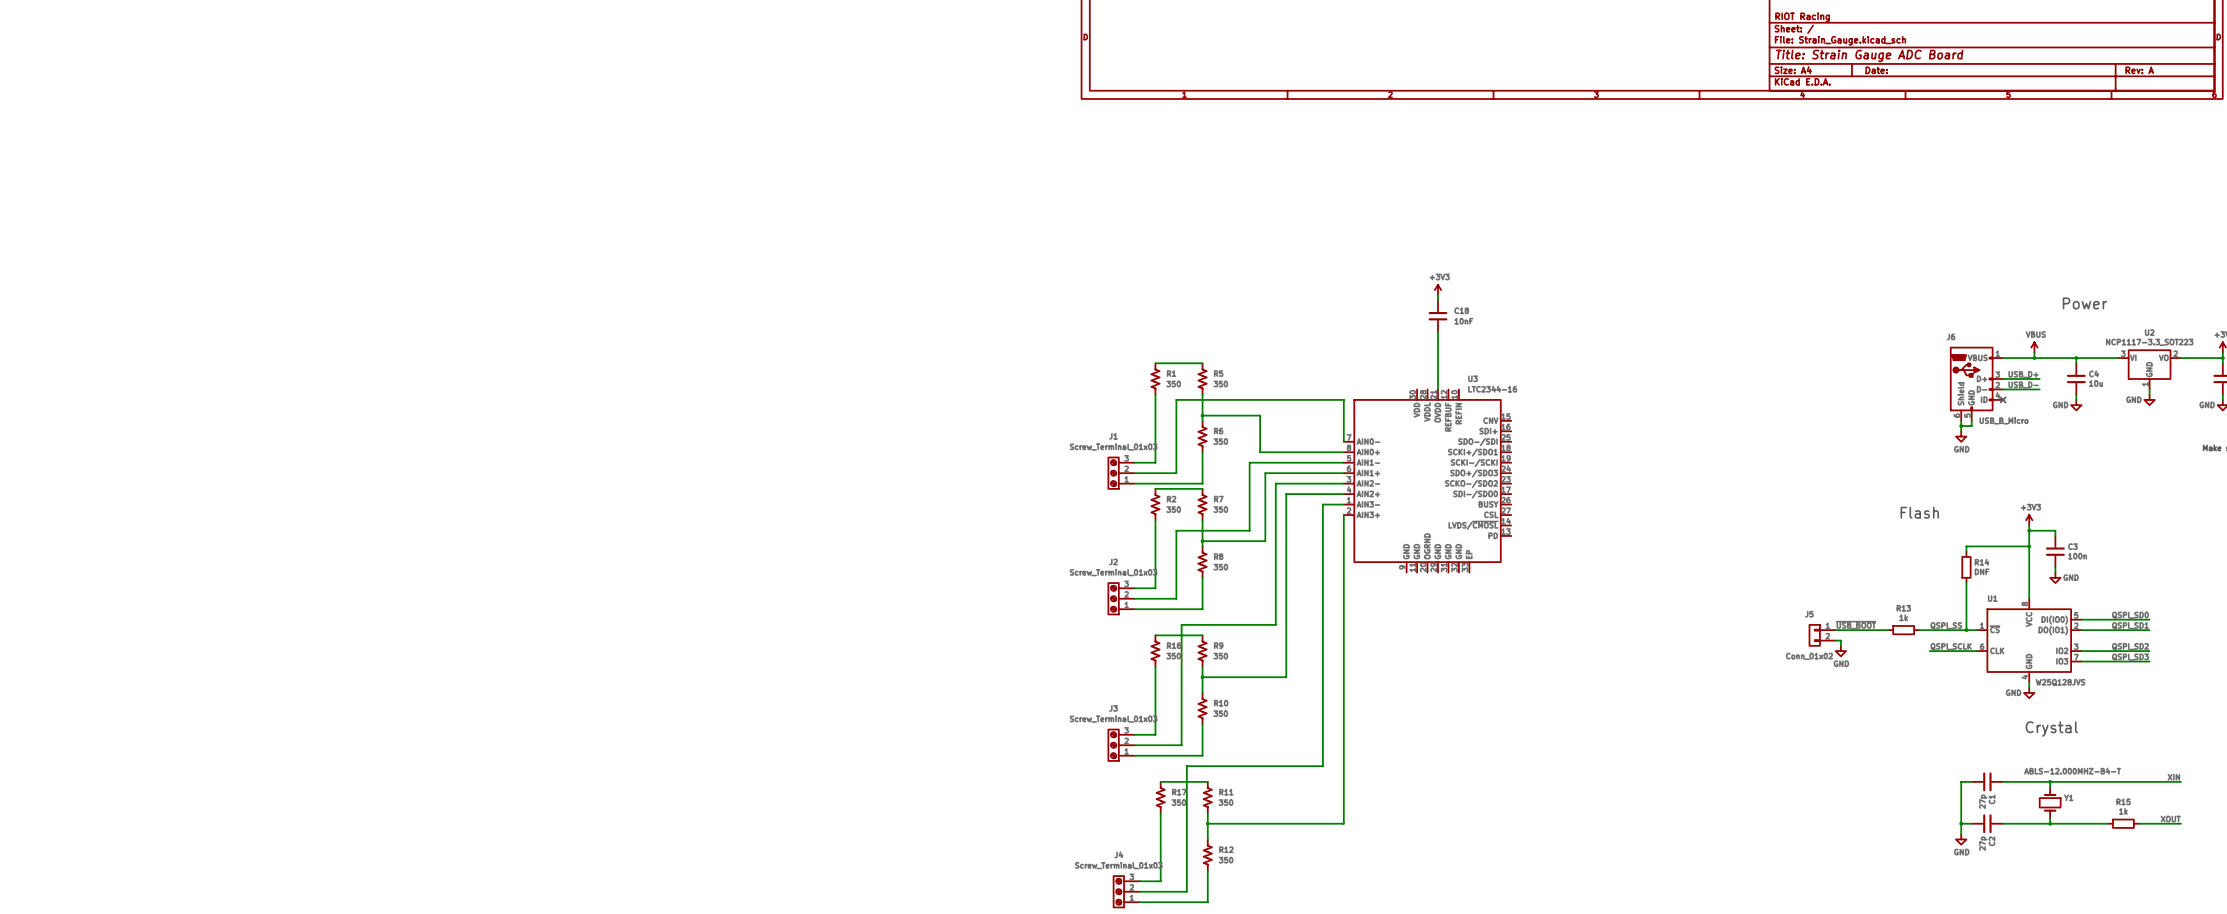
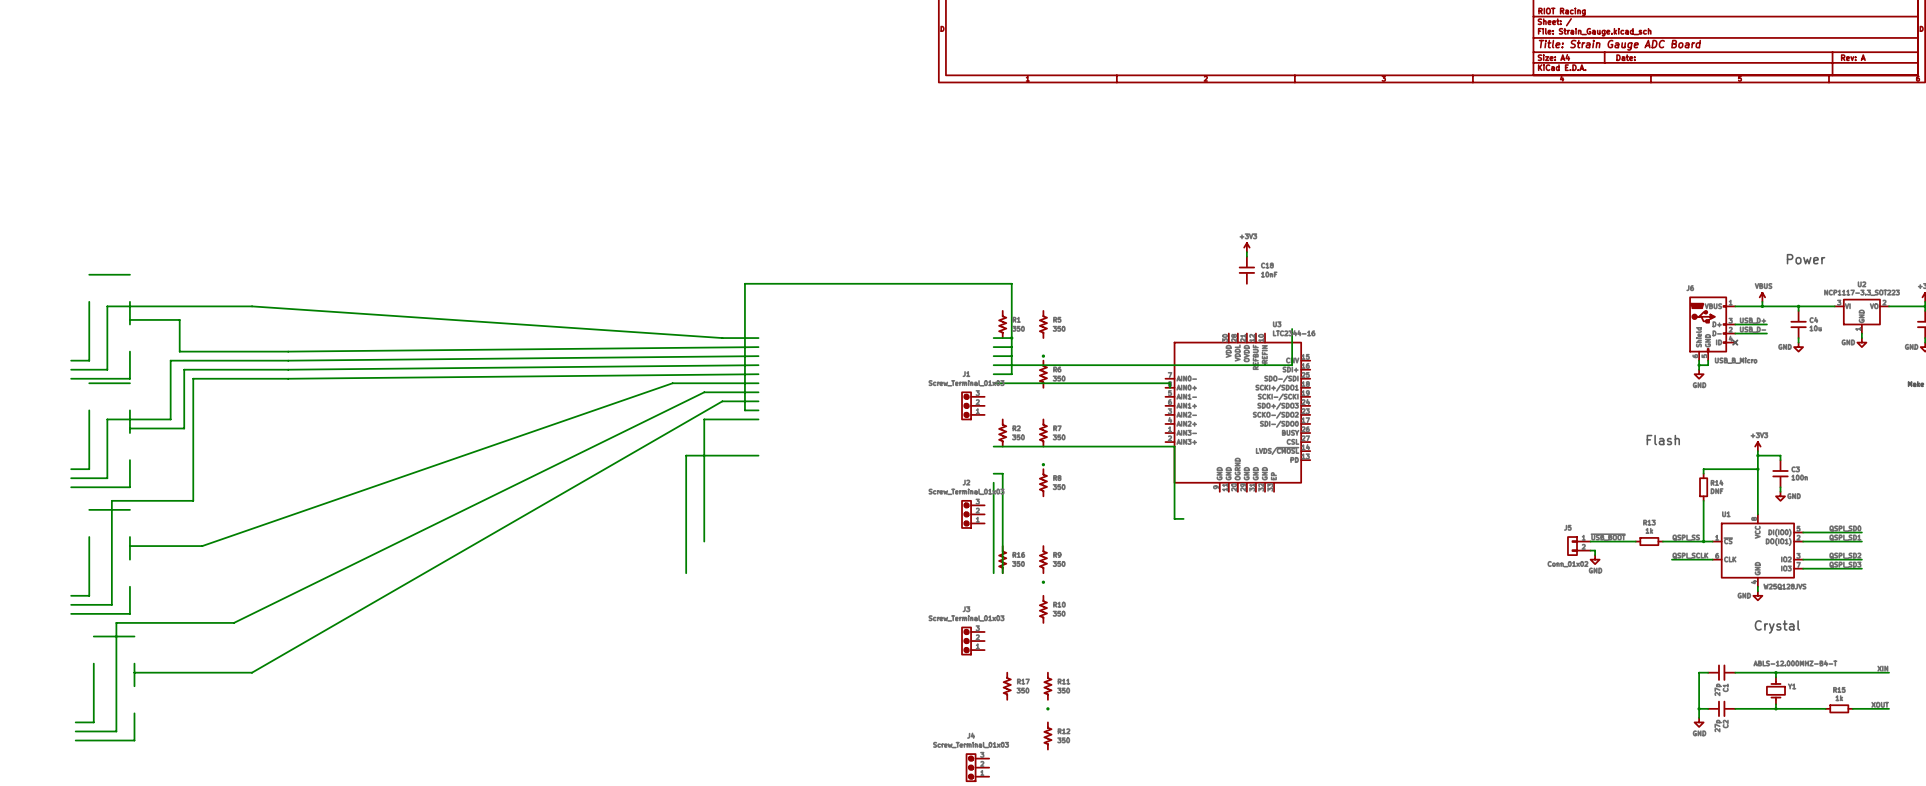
wire: none -> (89, 274) (129, 274)
wire: (1438, 331) (1438, 389) -> none
wire: none -> (89, 301) (89, 360) (71, 360)
wire: none -> (129, 301) (129, 324)
wire: (1155, 363) (1202, 363) -> none
wire: none -> (129, 319) (179, 319) (179, 351) (758, 347)
wire: none -> (1292, 329) (1292, 365) (993, 365)
wire: none -> (758, 338) (722, 338) (252, 306) (107, 306) (107, 369) (71, 369)
wire: none -> (993, 338) (1011, 338)
wire: (1155, 394) (1155, 462) (1134, 462) -> none
wire: (1202, 394) (1202, 420) -> none
wire: none -> (993, 347) (1011, 347)
wire: none -> (129, 351) (129, 378) (71, 378)
wire: none -> (758, 356) (170, 360) (170, 419) (107, 419) (107, 478) (71, 478)
wire: none -> (993, 356) (1011, 356)
wire: (1202, 415) (1260, 415) (1260, 452) (1343, 452) -> none
wire: none -> (758, 365) (184, 369) (184, 428) (129, 428)
wire: none -> (758, 374) (193, 378) (193, 500) (111, 500) (111, 604) (71, 604)
wire: none -> (993, 374) (1011, 374) (1011, 283) (744, 283) (744, 410) (758, 410)
wire: (1343, 441) (1343, 399) (1176, 399) (1176, 473) (1134, 473) -> none
wire: none -> (89, 383) (129, 383)
wire: none -> (758, 383) (672, 383) (202, 546) (129, 546)
wire: none -> (993, 383) (1170, 383) (1170, 387)
wire: (1202, 452) (1202, 483) (1134, 483) -> none
wire: none -> (758, 392) (704, 392) (233, 622) (116, 622) (116, 731) (75, 731)
wire: (1343, 462) (1249, 462) (1249, 530) (1176, 530) (1176, 598) (1134, 598) -> none
wire: none -> (758, 401) (722, 401) (252, 672) (134, 672)
wire: (1343, 473) (1265, 473) (1265, 541) (1202, 541) -> none
wire: none -> (89, 410) (89, 469) (71, 469)
wire: none -> (129, 410) (129, 433)
wire: (1343, 483) (1275, 483) (1275, 624) (1181, 624) (1181, 745) (1134, 745) -> none
wire: none -> (758, 419) (704, 419) (704, 541)
wire: (1155, 488) (1202, 488) -> none
wire: (1343, 494) (1286, 494) (1286, 677) (1202, 677) -> none
wire: (1343, 504) (1322, 504) (1322, 766) (1186, 766) (1186, 891) (1139, 891) -> none
wire: (1343, 515) (1343, 823) (1207, 823) -> none
wire: none -> (993, 446) (1174, 446) (1174, 518) (1183, 518)
wire: (1155, 520) (1155, 551) -> (993, 473) (1002, 473)
wire: (1202, 520) (1202, 546) -> none
wire: none -> (758, 455) (686, 455) (686, 573)
wire: none -> (129, 460) (129, 487) (71, 487)
wire: none -> (993, 482) (993, 573)
wire: (1202, 577) (1202, 609) (1134, 609) -> none
wire: (1134, 588) (1155, 588) -> (1002, 573) (1002, 505)
wire: none -> (89, 509) (129, 509)
wire: none -> (89, 537) (89, 595) (71, 595)
wire: none -> (129, 537) (129, 559)
wire: (1155, 635) (1202, 635) -> none
wire: (1155, 666) (1155, 734) (1134, 734) -> none
wire: (1202, 666) (1202, 692) -> none
wire: none -> (129, 586) (129, 613) (71, 613)
wire: (1202, 724) (1202, 755) (1134, 755) -> none
wire: none -> (93, 636) (134, 636)
wire: none -> (93, 663) (93, 722) (75, 722)
wire: none -> (134, 663) (134, 686)
wire: (1160, 781) (1207, 781) -> none
wire: (1160, 813) (1160, 881) (1139, 881) -> none
wire: (1207, 813) (1207, 839) -> none
wire: none -> (134, 713) (134, 740) (75, 740)
wire: (1207, 870) (1207, 902) (1139, 902) -> none

